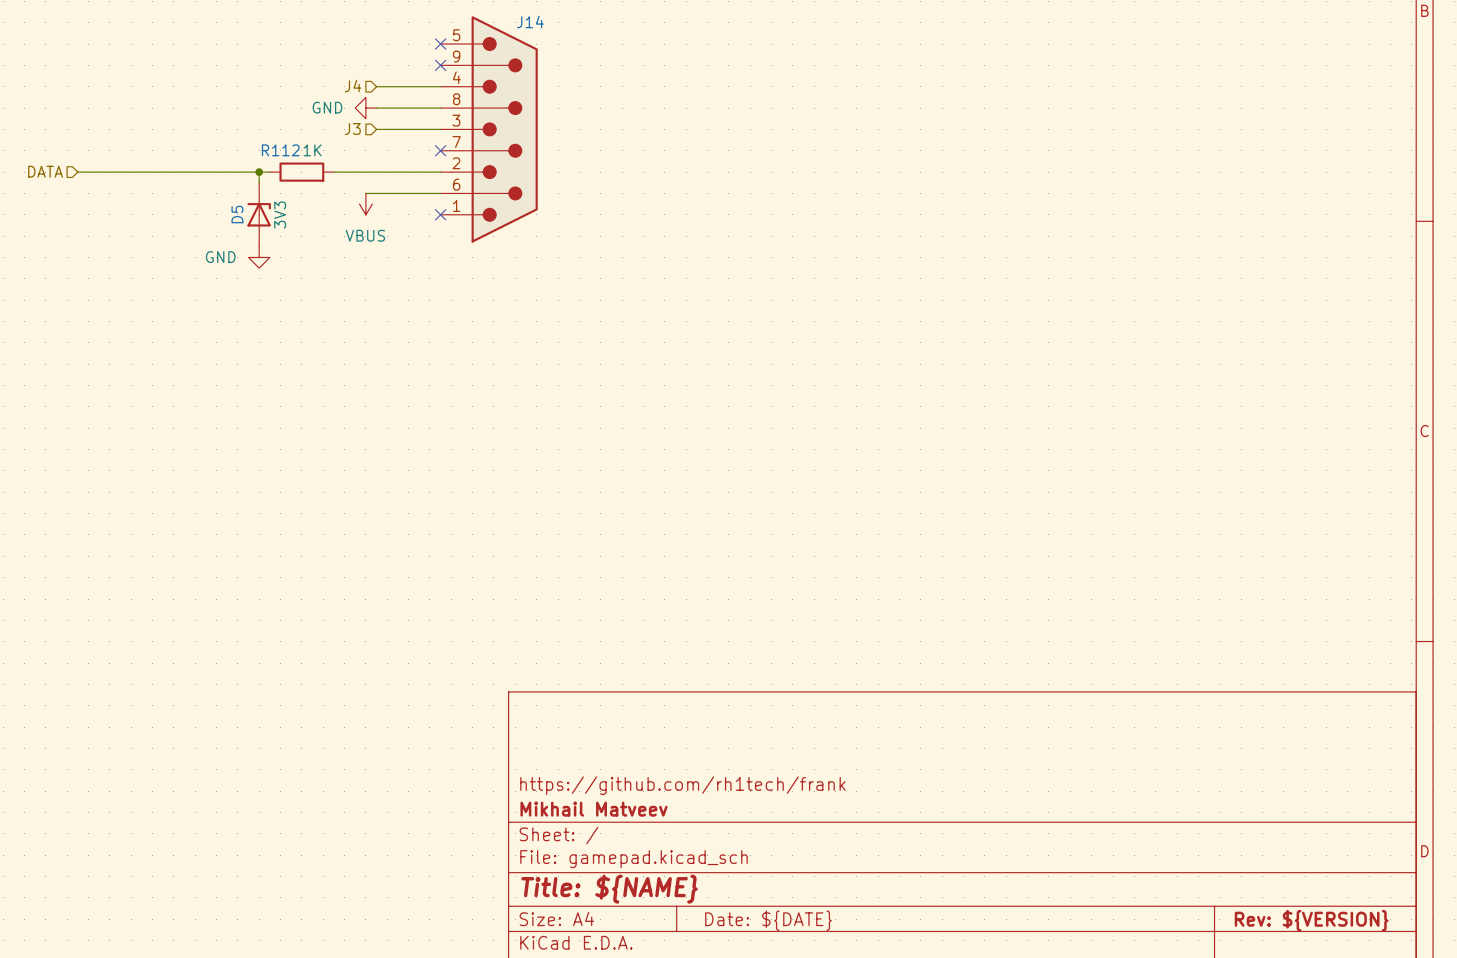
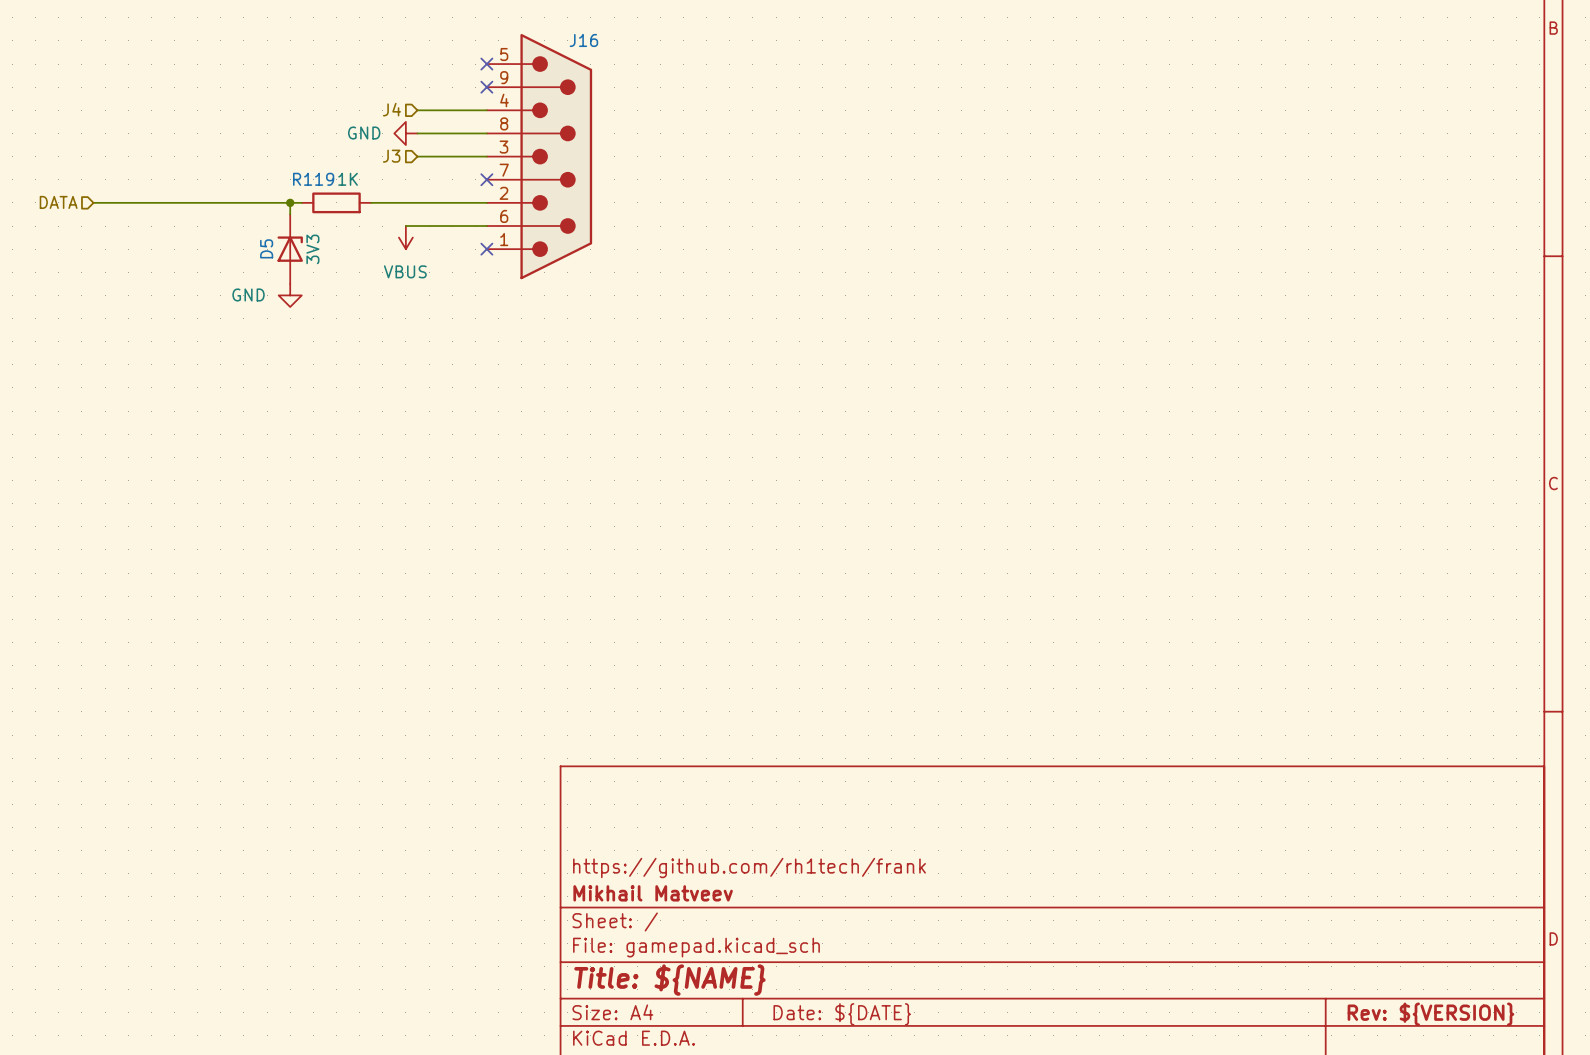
J14 name: J14 (530, 22) -> J16 (583, 40)
R112 name: R112 (280, 150) -> R119 (313, 179)

